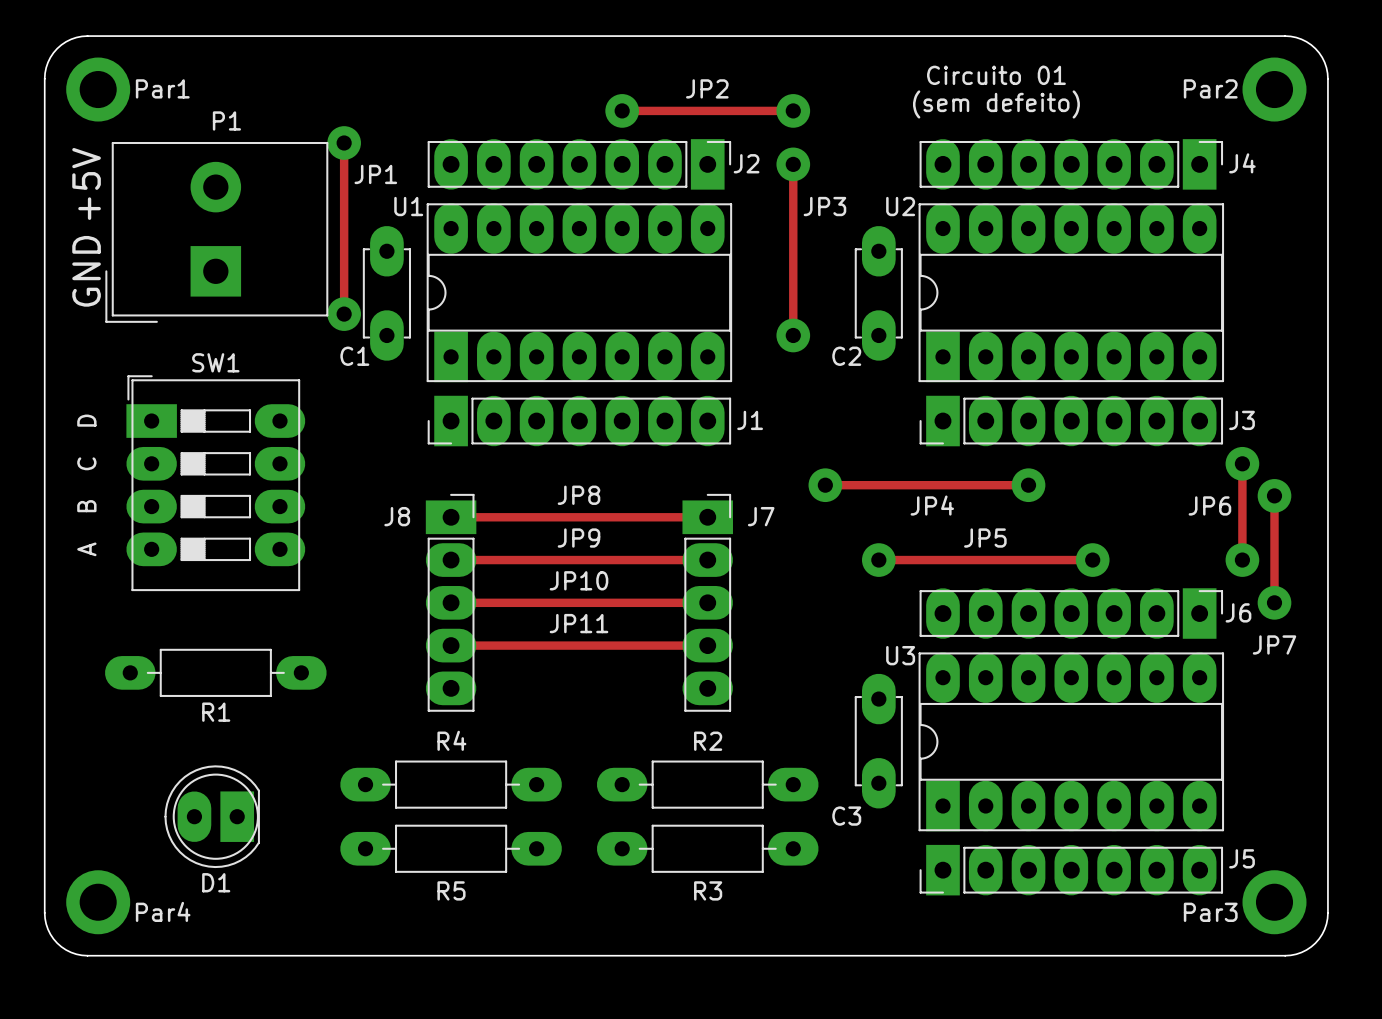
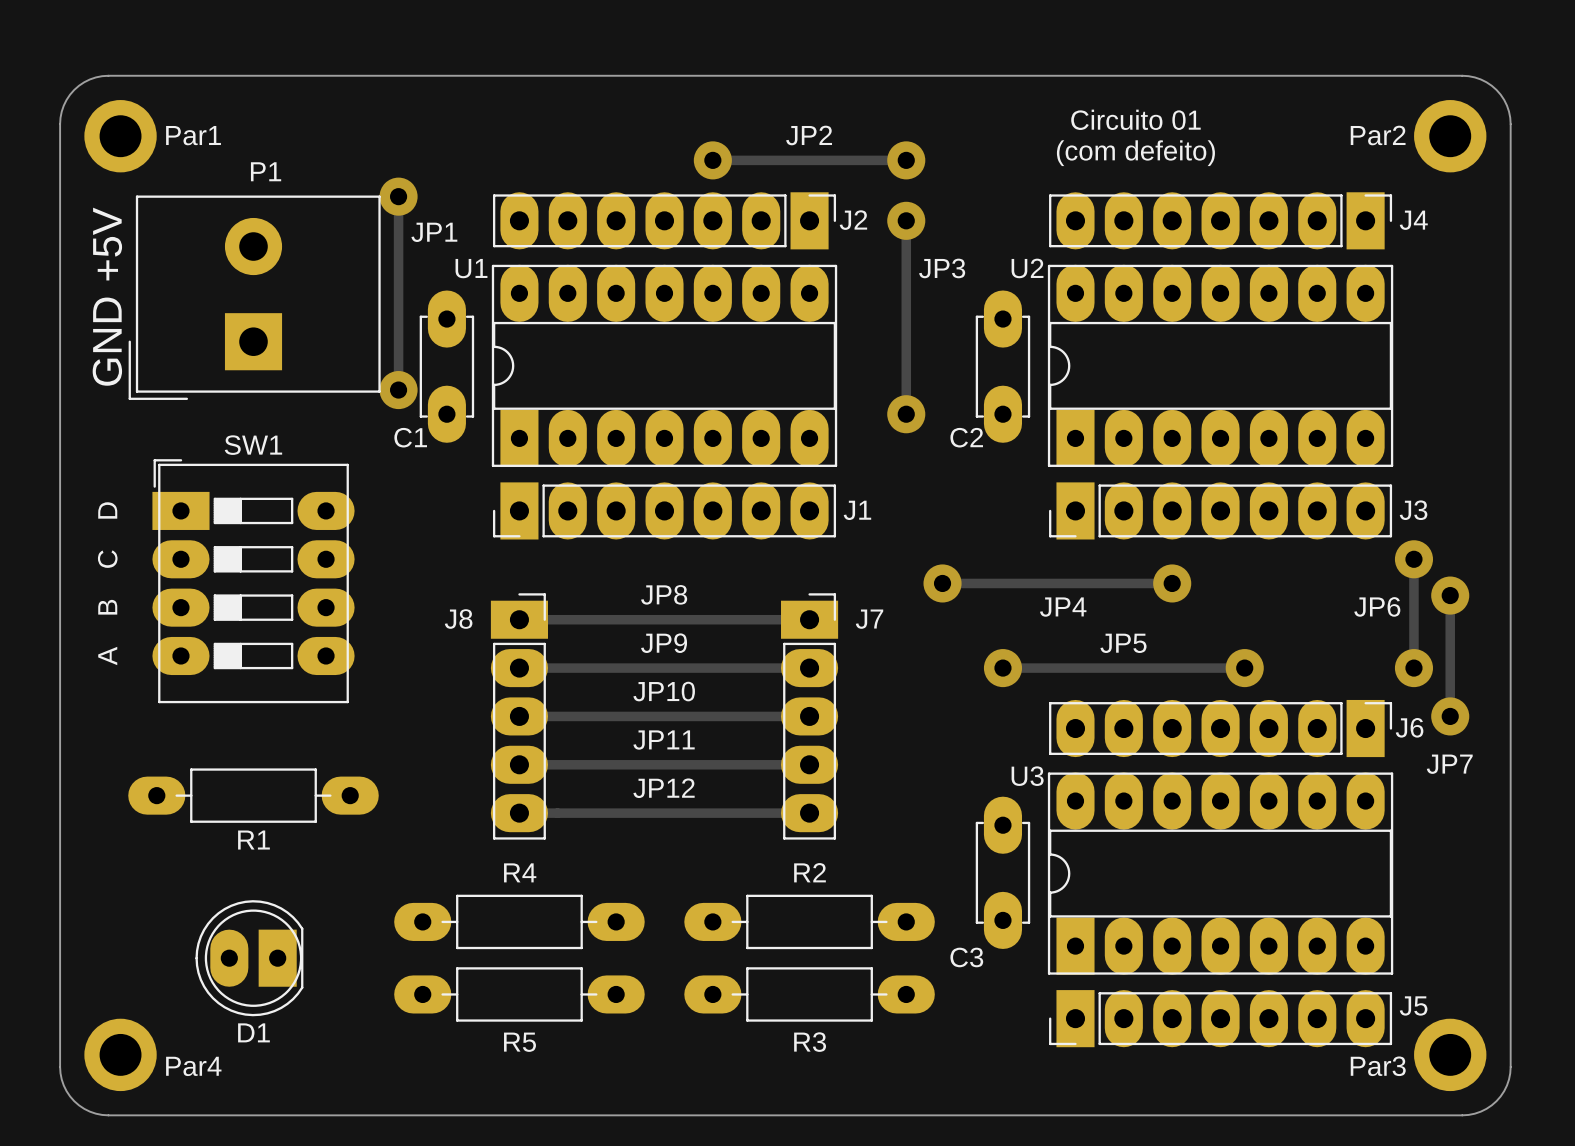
text: (sem defeito) (996, 104) -> (com defeito) (1135, 153)
text: none -> JP12 (664, 788)
track: none -> (519, 813) (809, 813)

